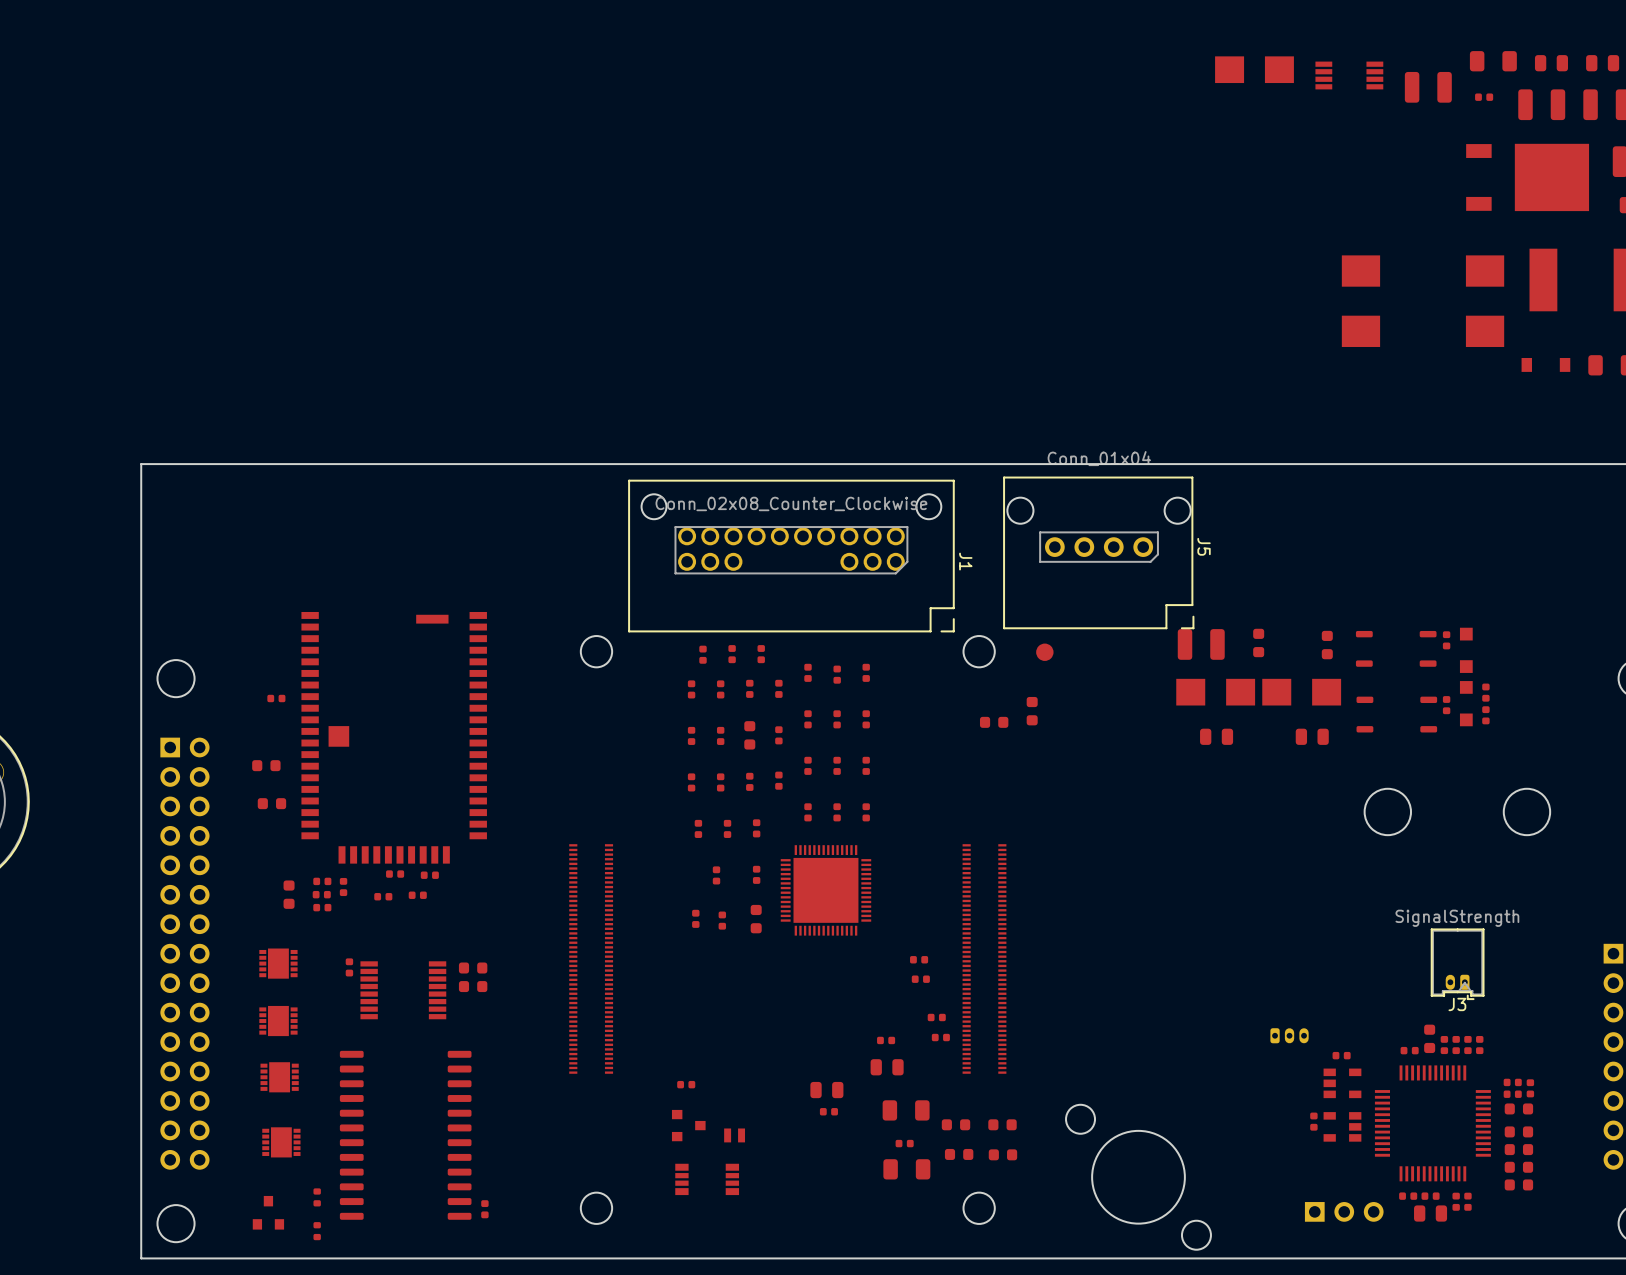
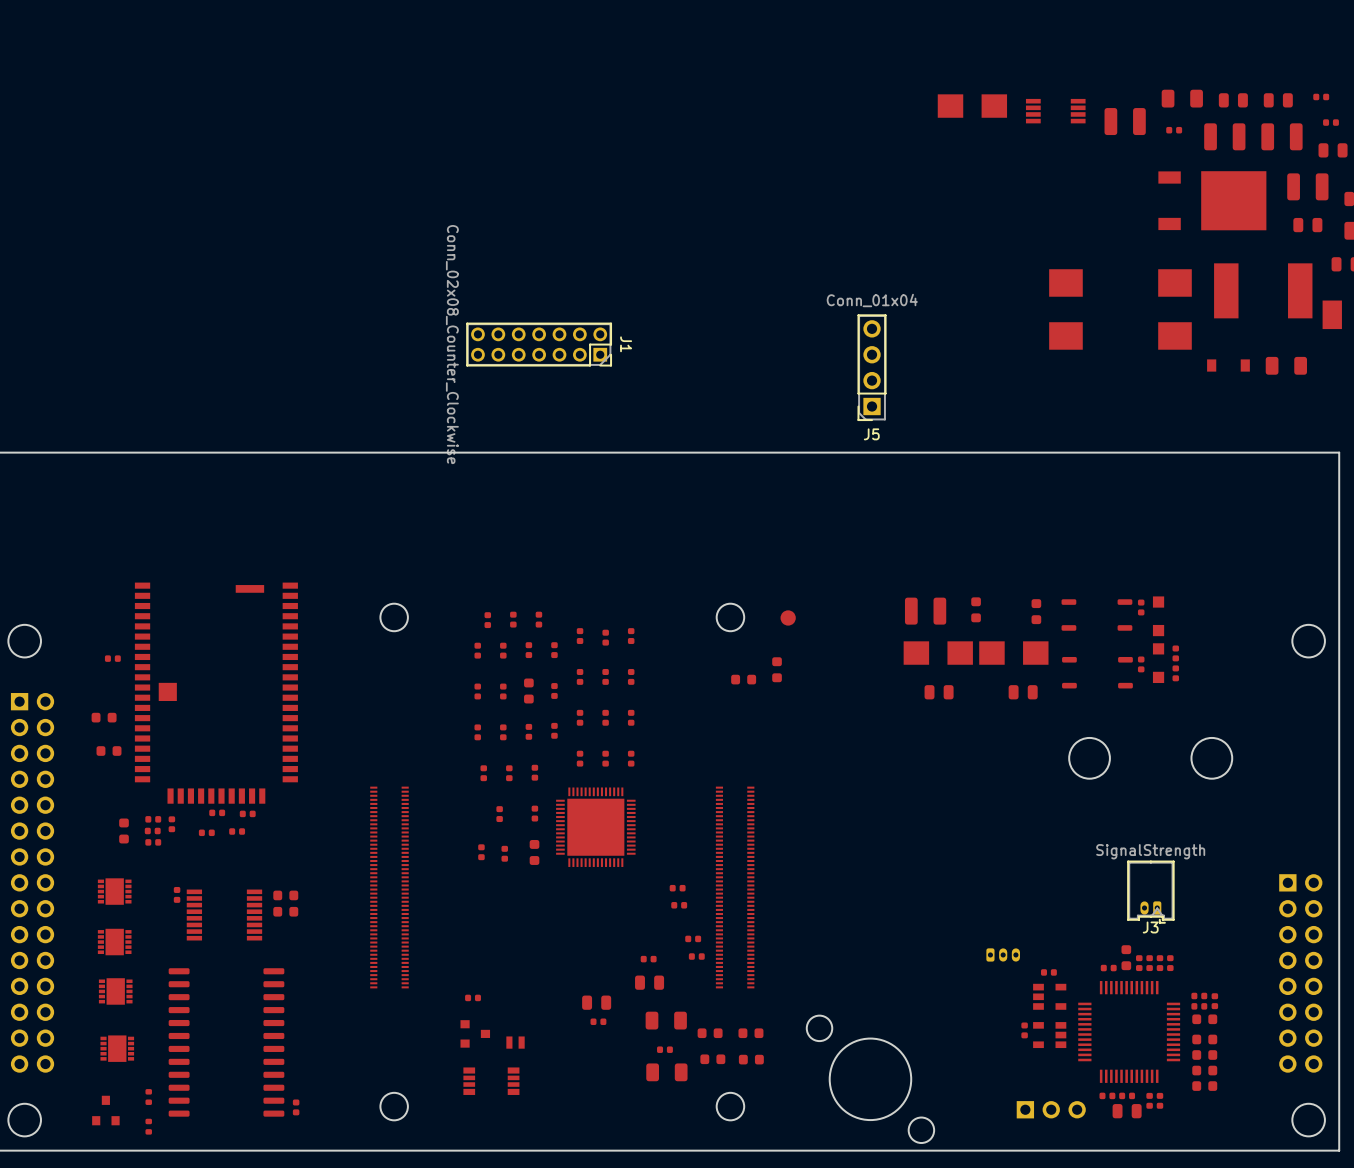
J5 footprint: [1003, 476, 1195, 629] -> [857, 314, 887, 421]
J1 footprint: [628, 479, 955, 633] -> [466, 322, 612, 367]
J1 value position: Conn_02x08_Counter_Clockwise (791, 503) -> Conn_02x08_Counter_Clockwise (452, 344)
J5 name position: J5 (1204, 546) -> J5 (871, 434)
J1 name position: J1 (965, 561) -> J1 (626, 344)

